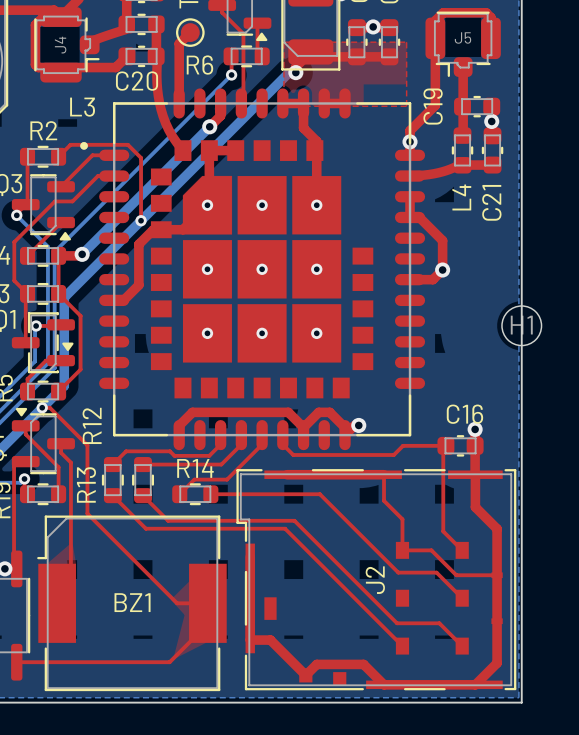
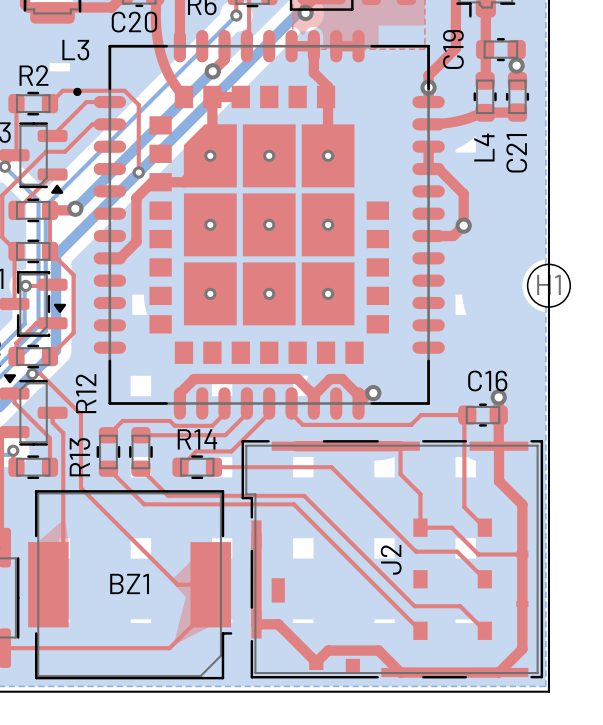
BZ1 rotation: 0° (131, 603) -> 180° (130, 584)

